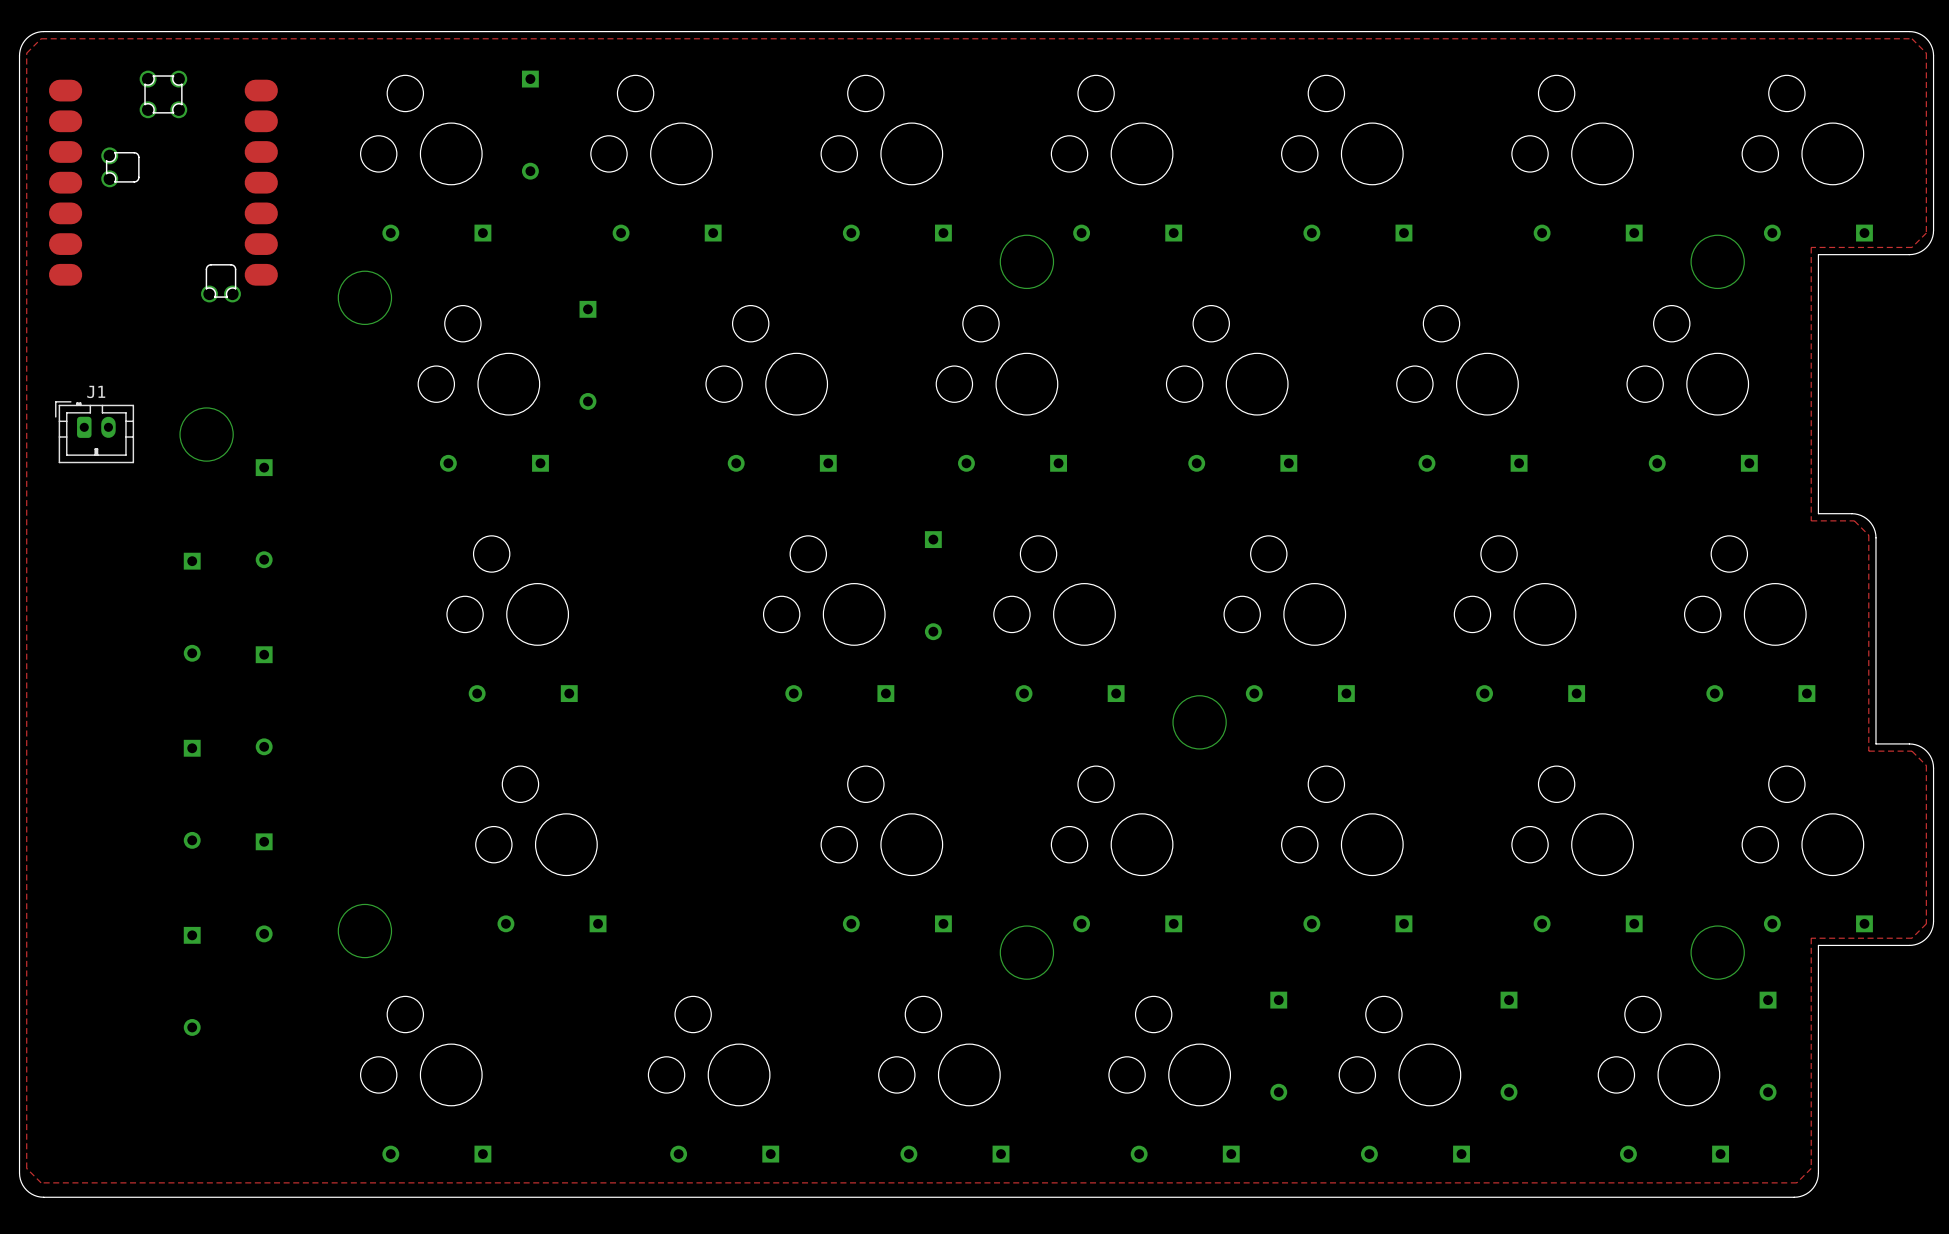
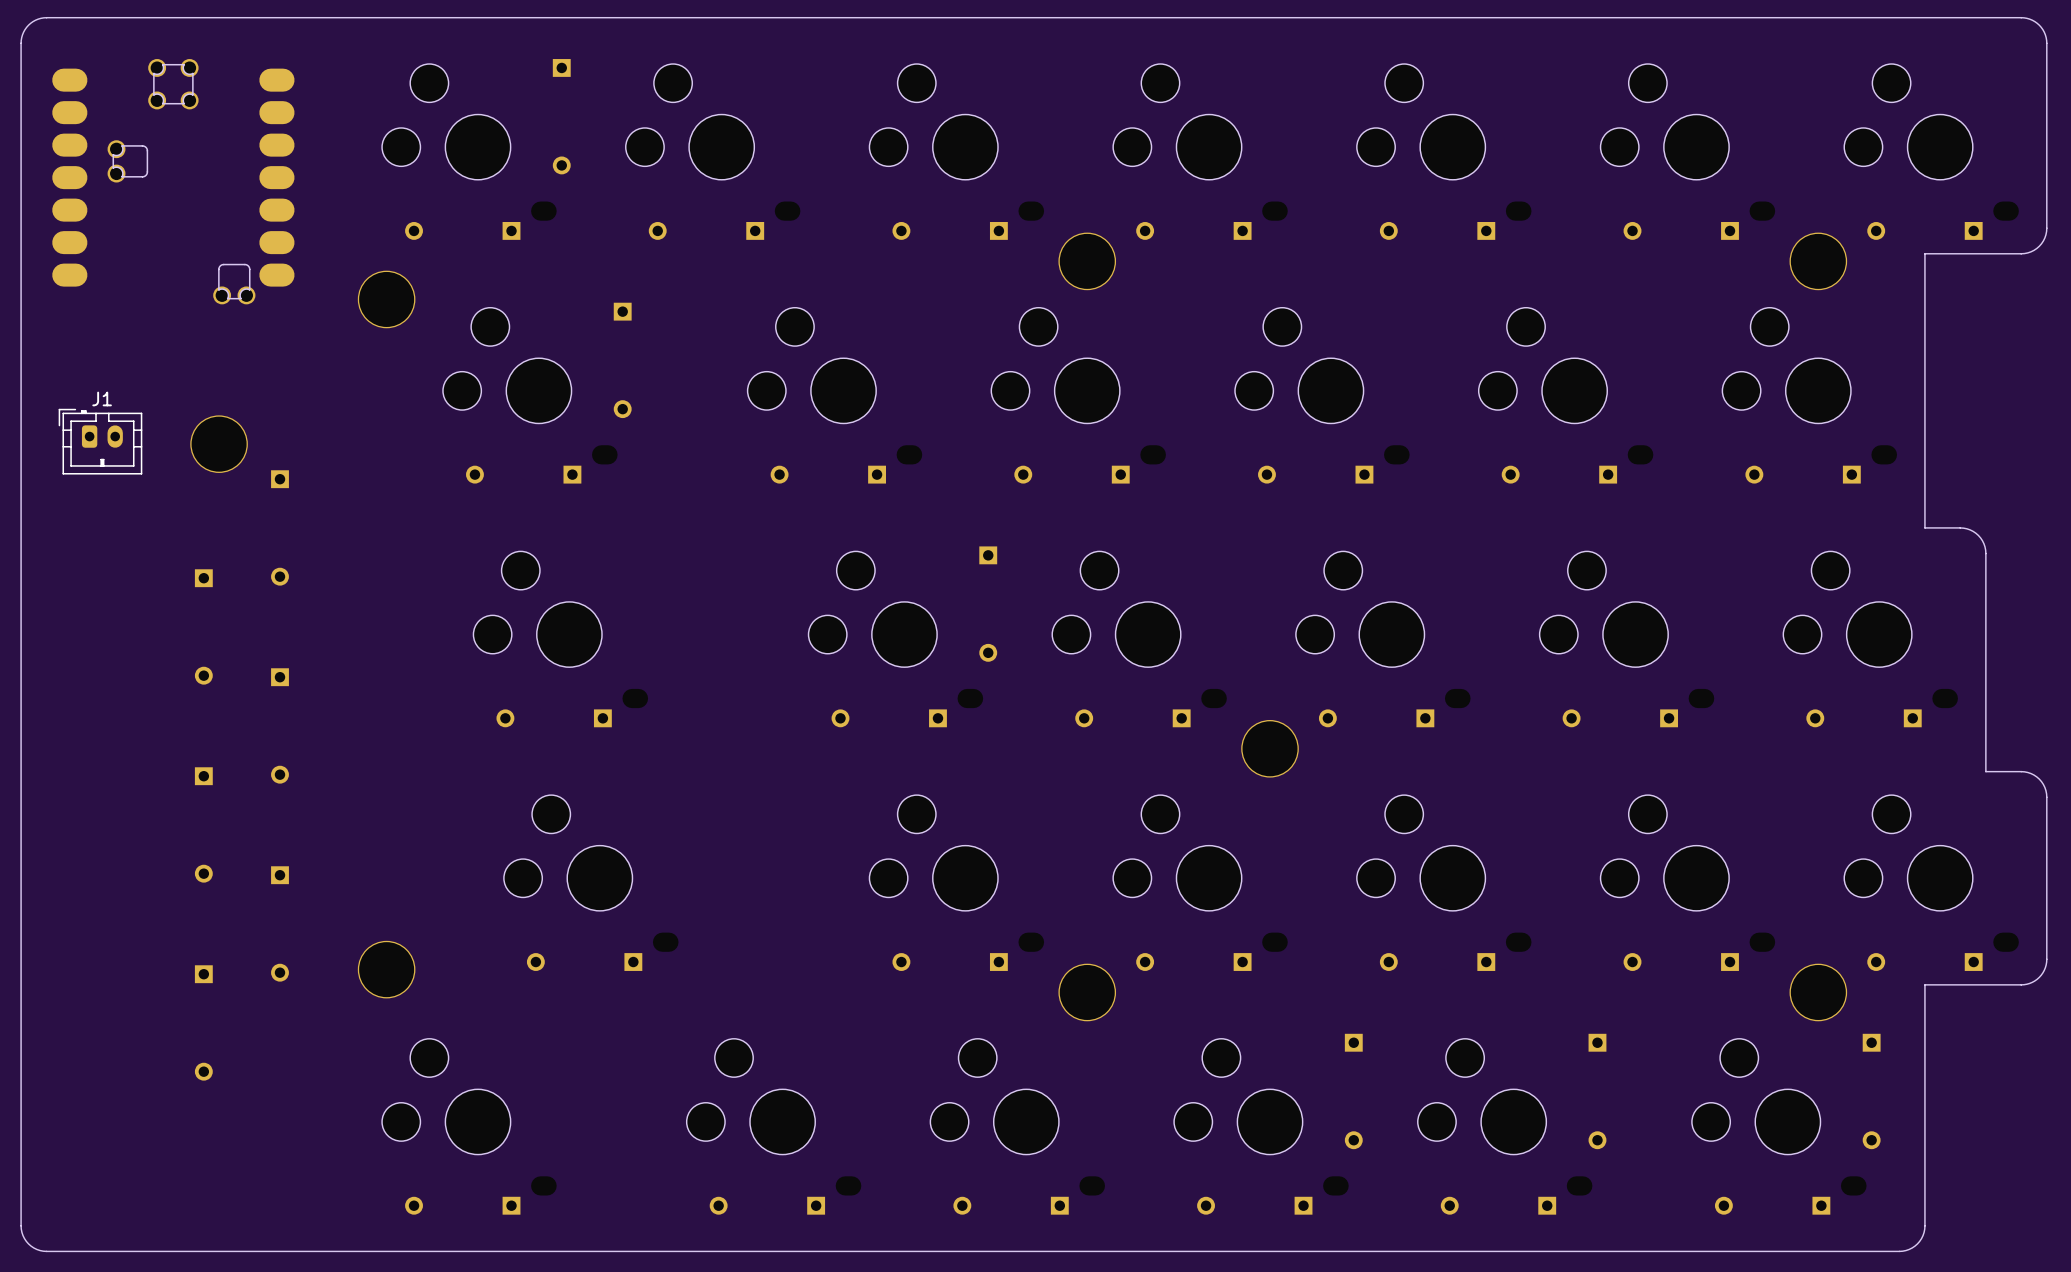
zone outline: (41, 38) (26, 53) (26, 1168) (41, 1182) (1796, 1182) (1811, 1168) (1811, 938) (1911, 938) (1926, 923) (1926, 765) (1911, 751) (1868, 751) (1868, 535) (1854, 520) (1811, 520) (1811, 247) (1911, 247) (1926, 233) (1926, 53) (1911, 38) (41, 38) -> none

